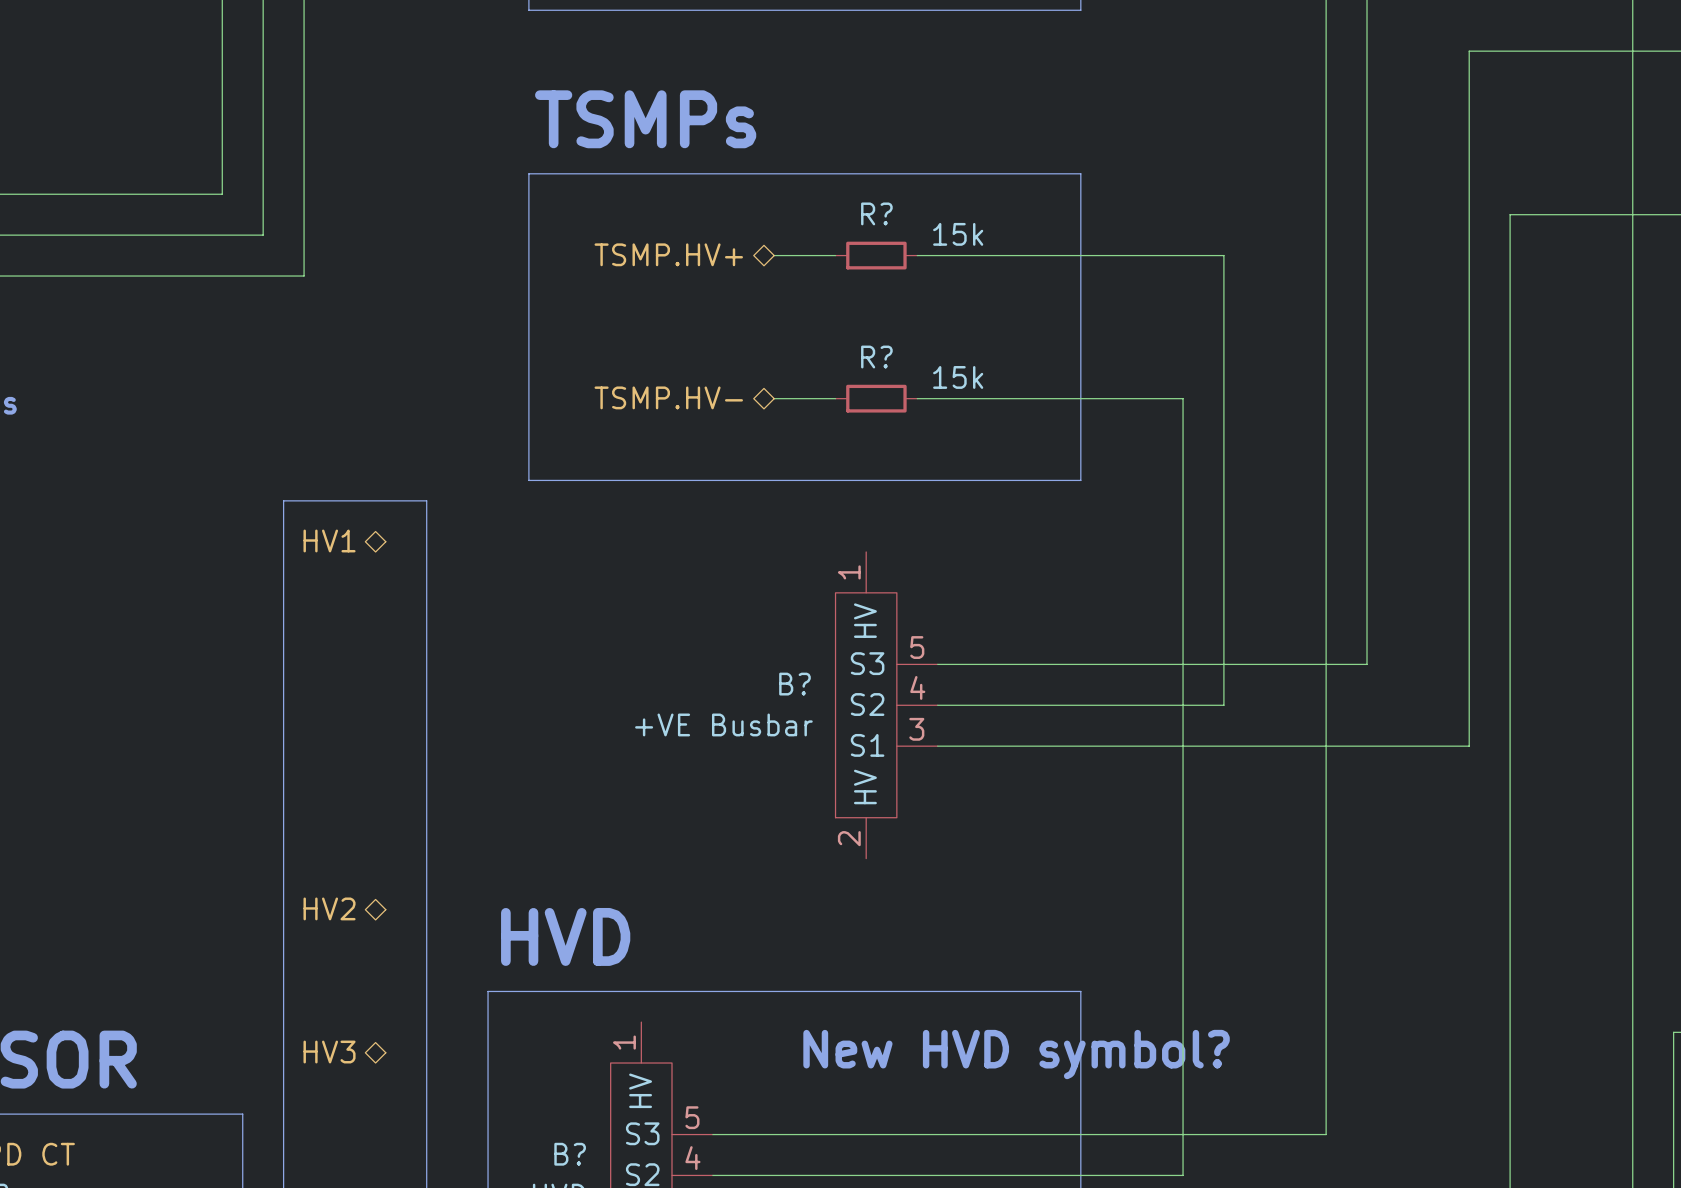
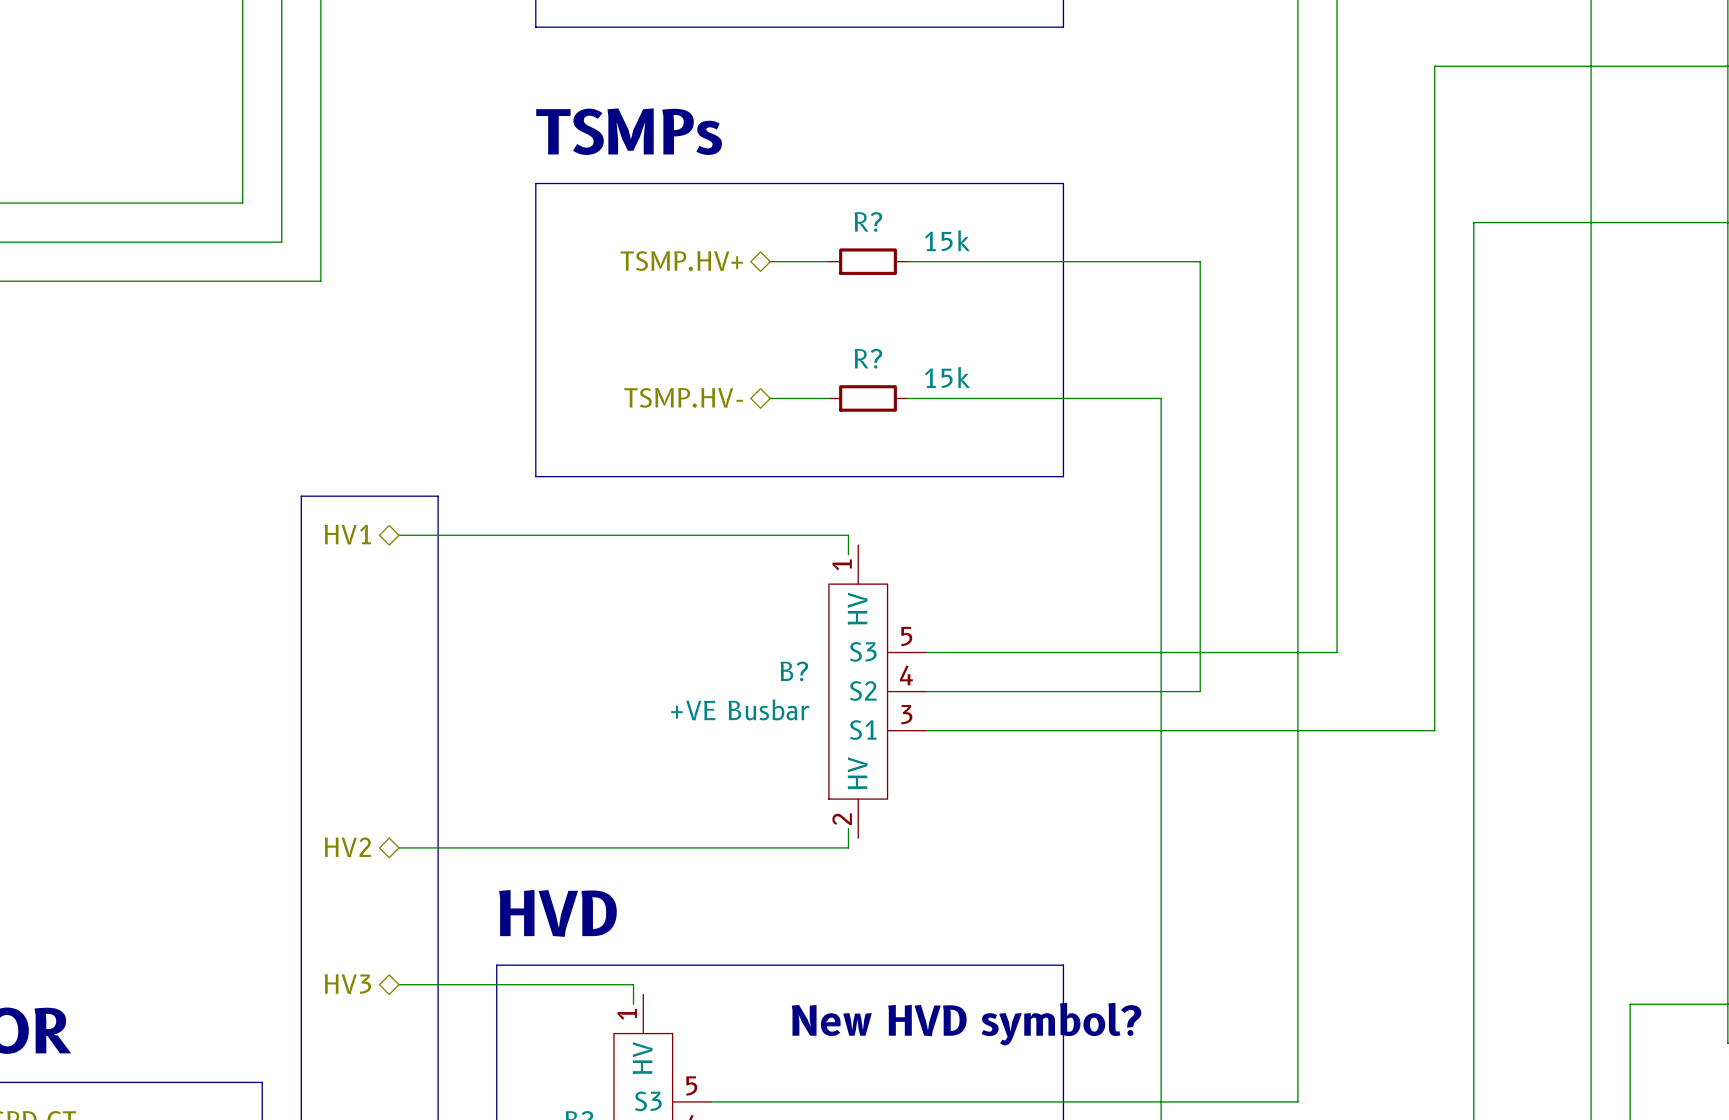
wire: none -> (399, 535) (848, 535) (848, 554)
wire: none -> (848, 828) (848, 847) (399, 847)
hierarchical label position: HV2 (329, 908) -> HV2 (347, 847)
wire: none -> (399, 984) (633, 984) (633, 1004)
hierarchical label position: HV3 (329, 1052) -> HV3 (347, 984)

